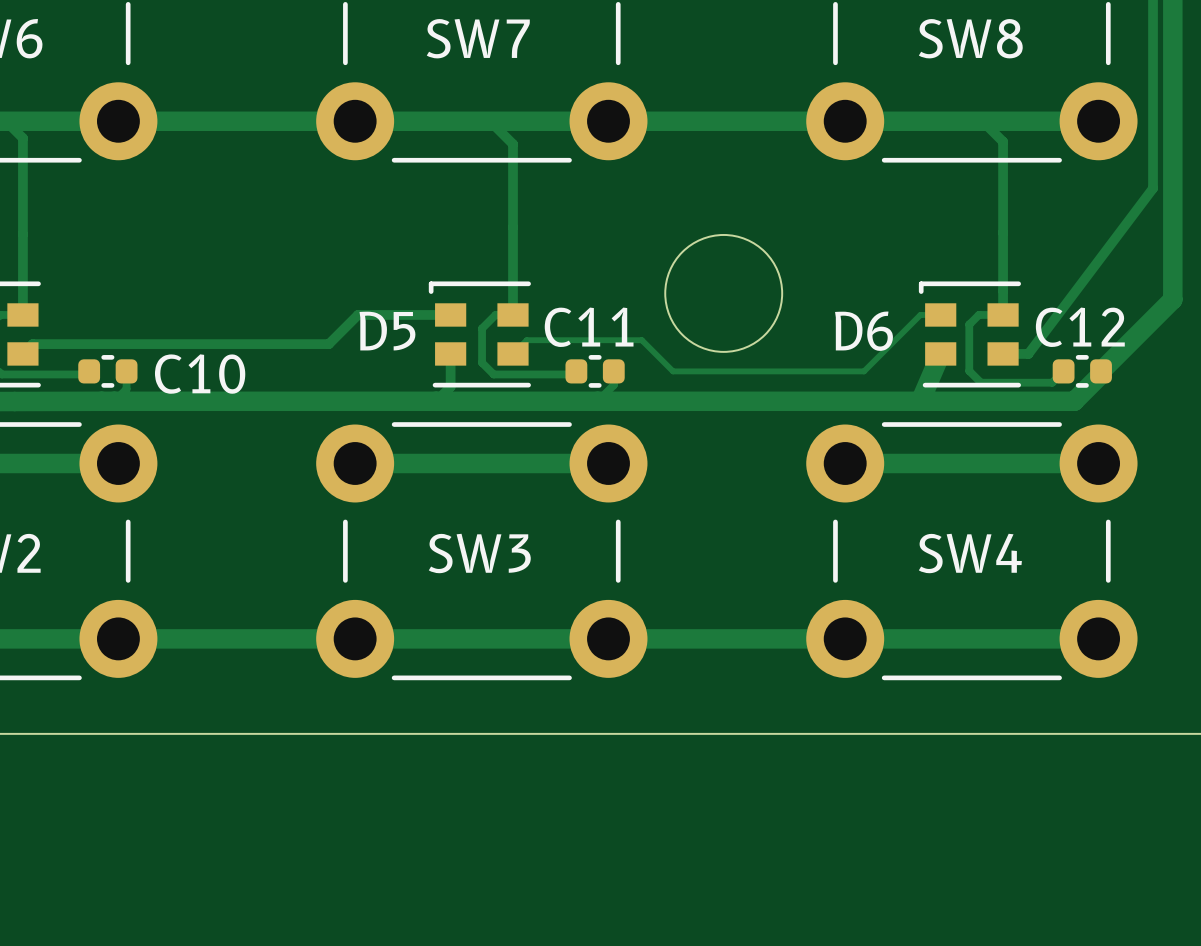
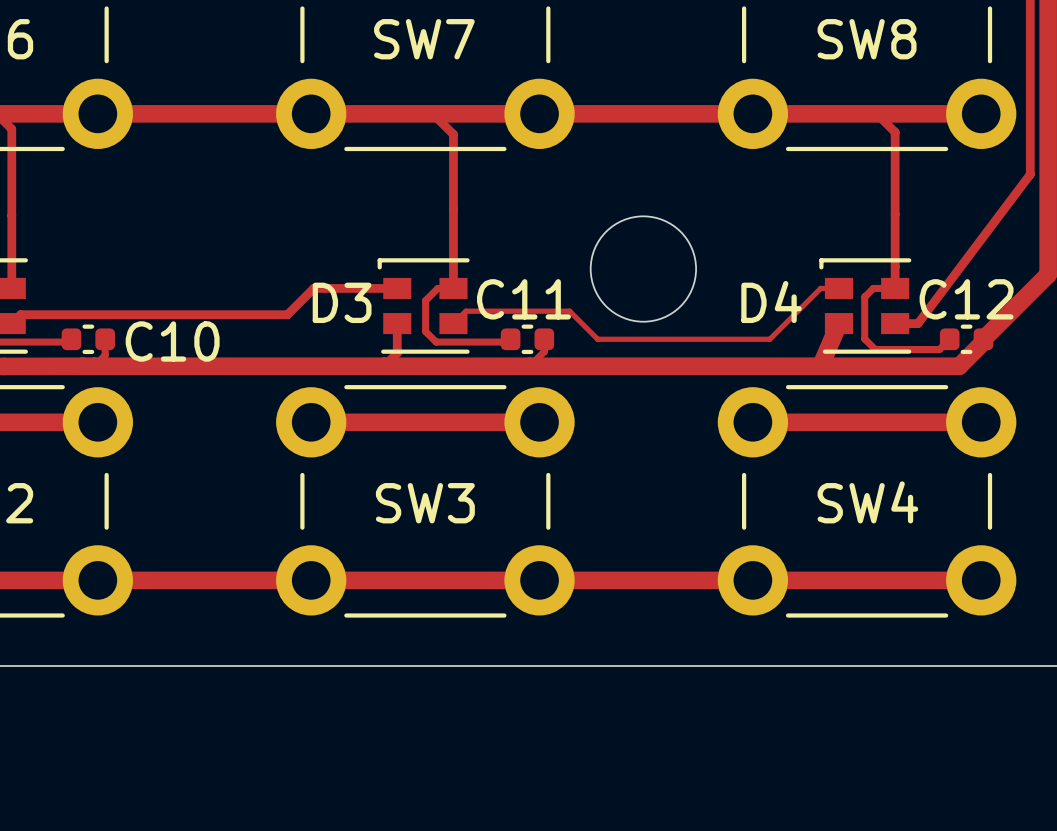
D5 name: D5 (387, 331) -> D3 (342, 302)
D6 name: D6 (863, 331) -> D4 (771, 302)

